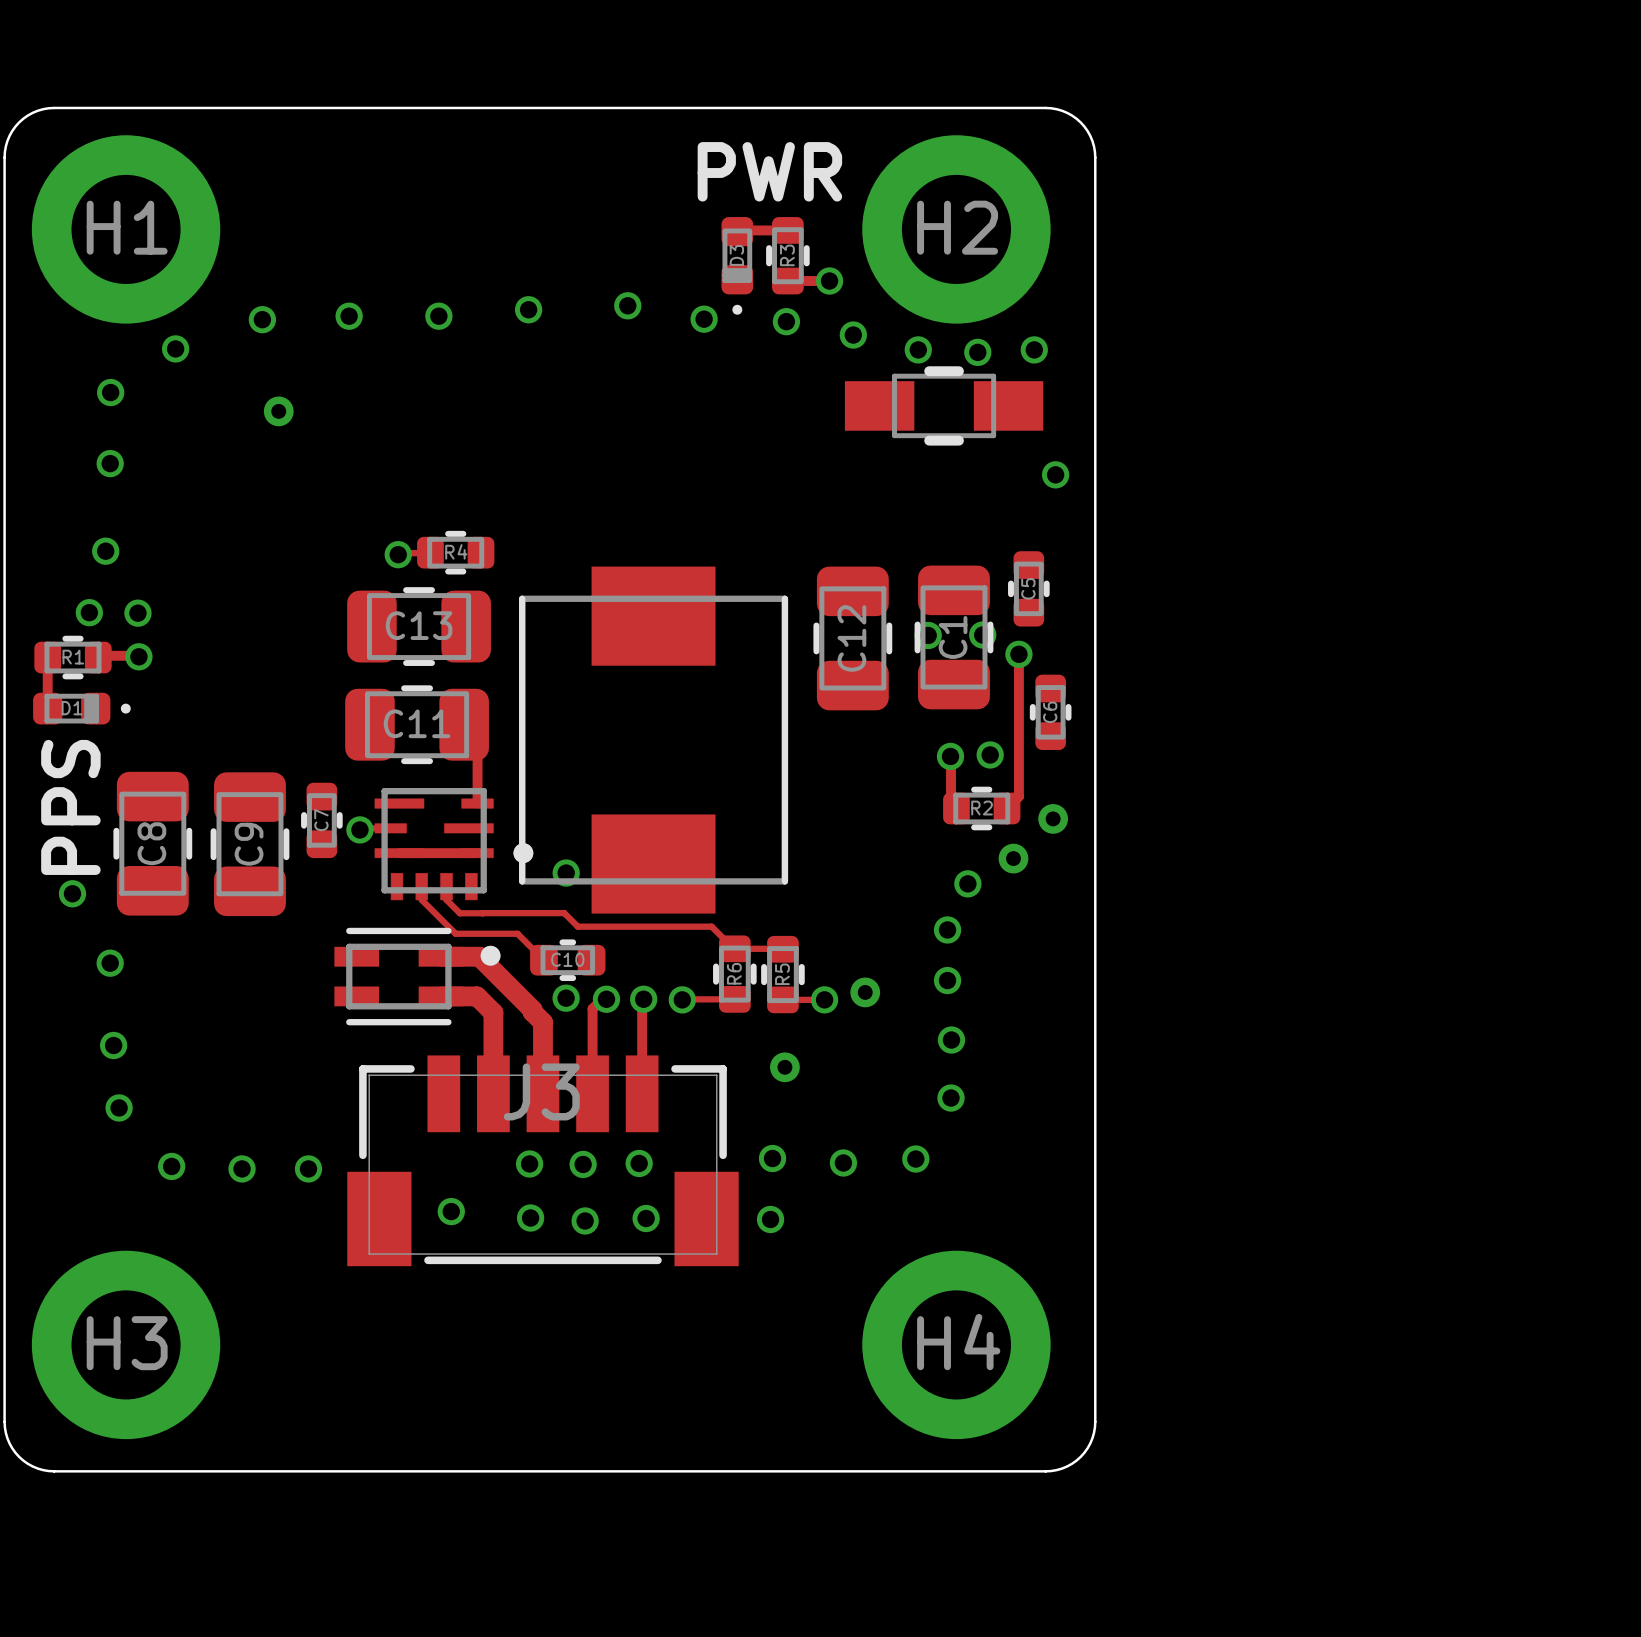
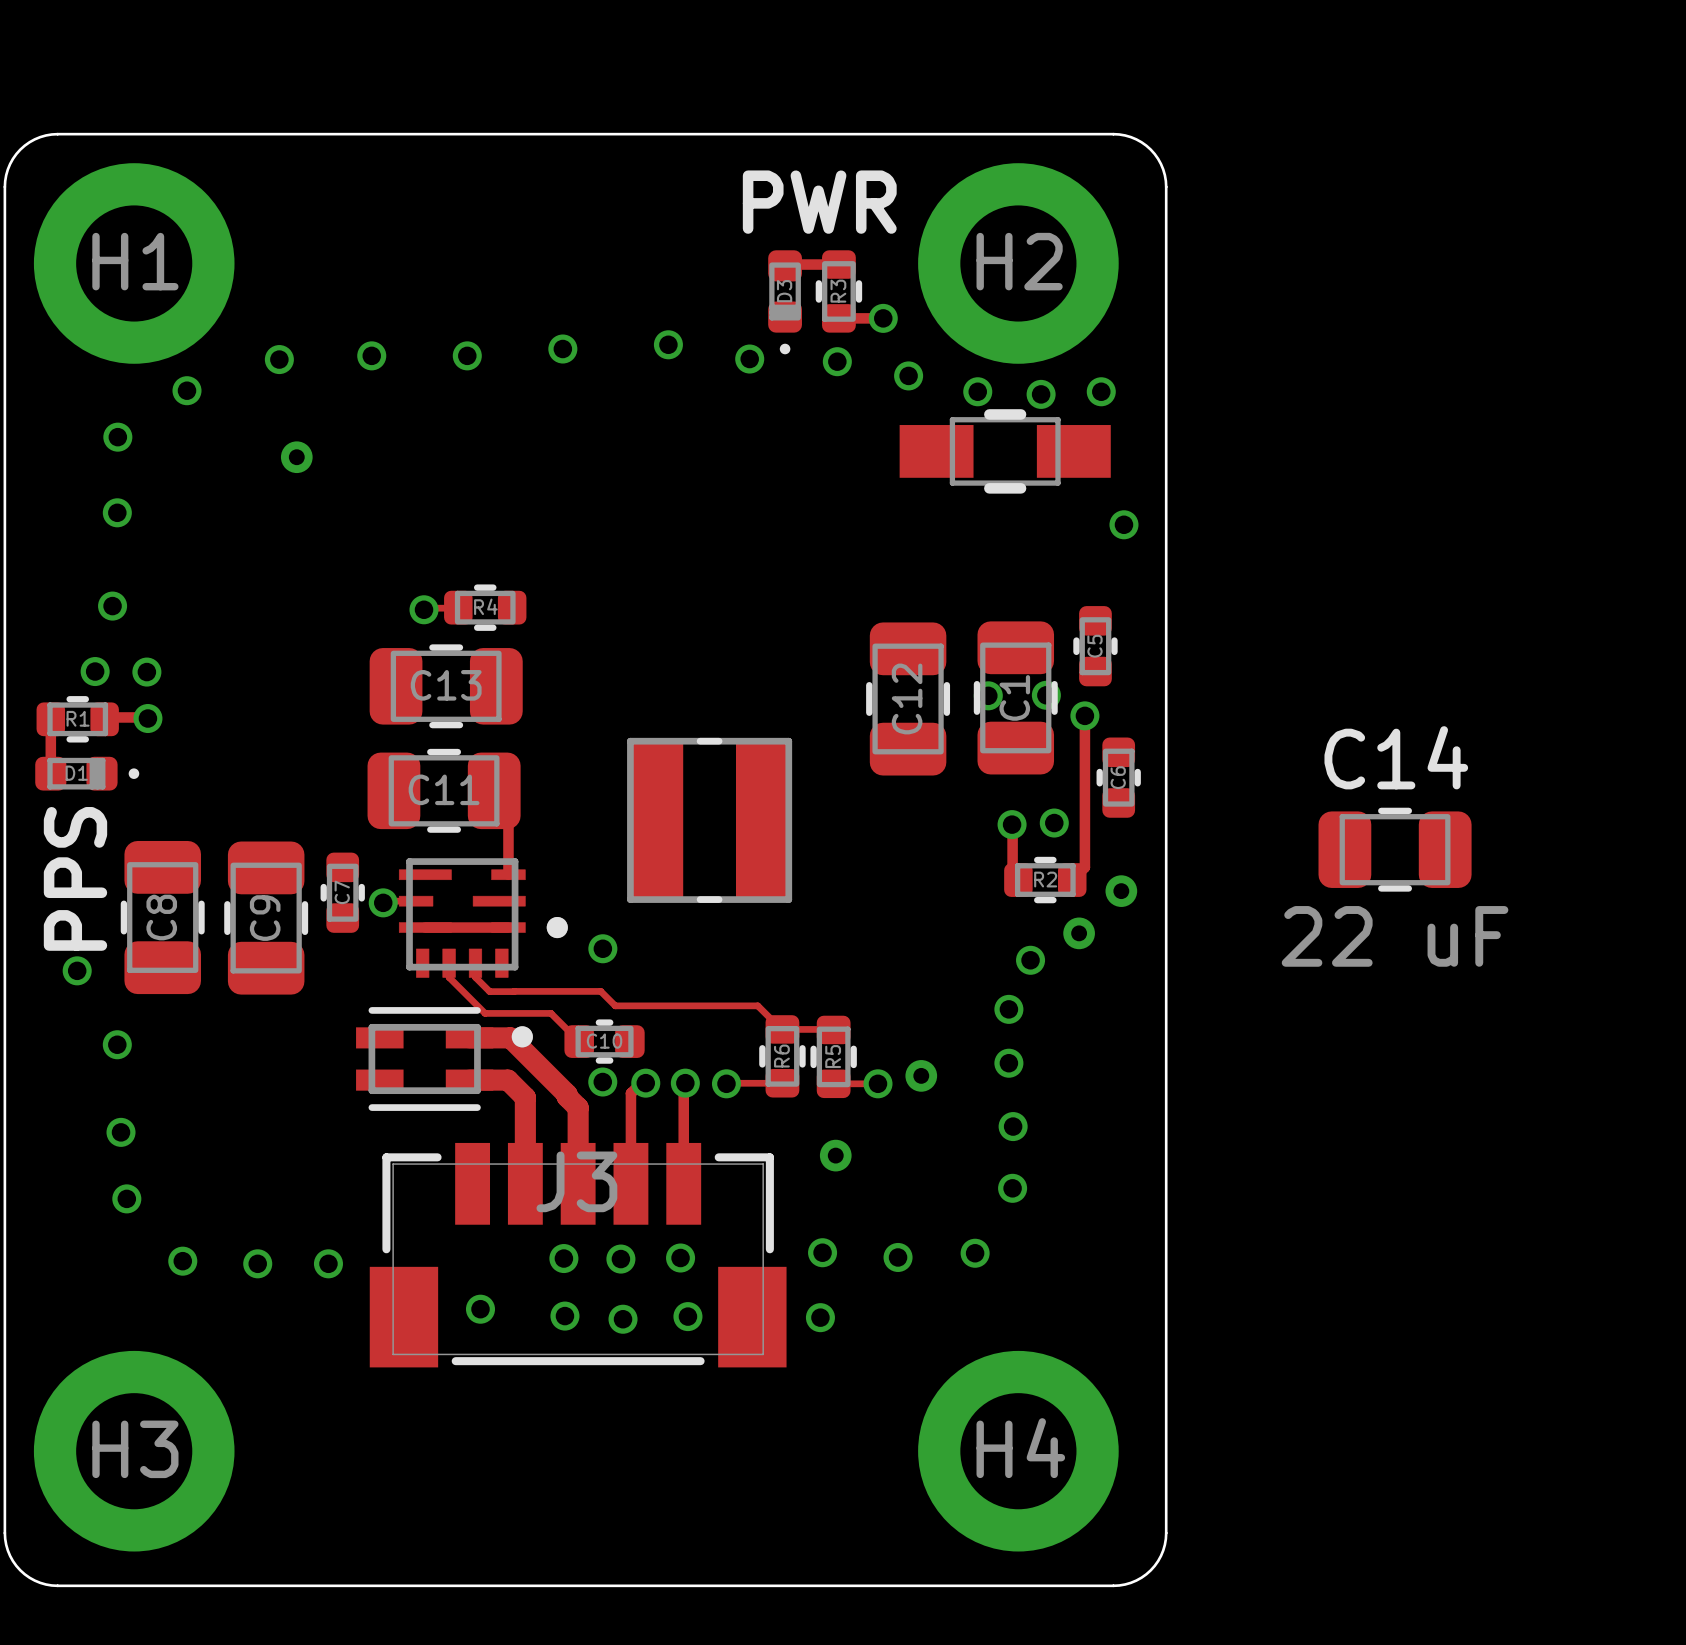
part footprint: [519, 566, 789, 914] -> [627, 737, 793, 903]
C14: none -> 22 uF (1395, 849)

